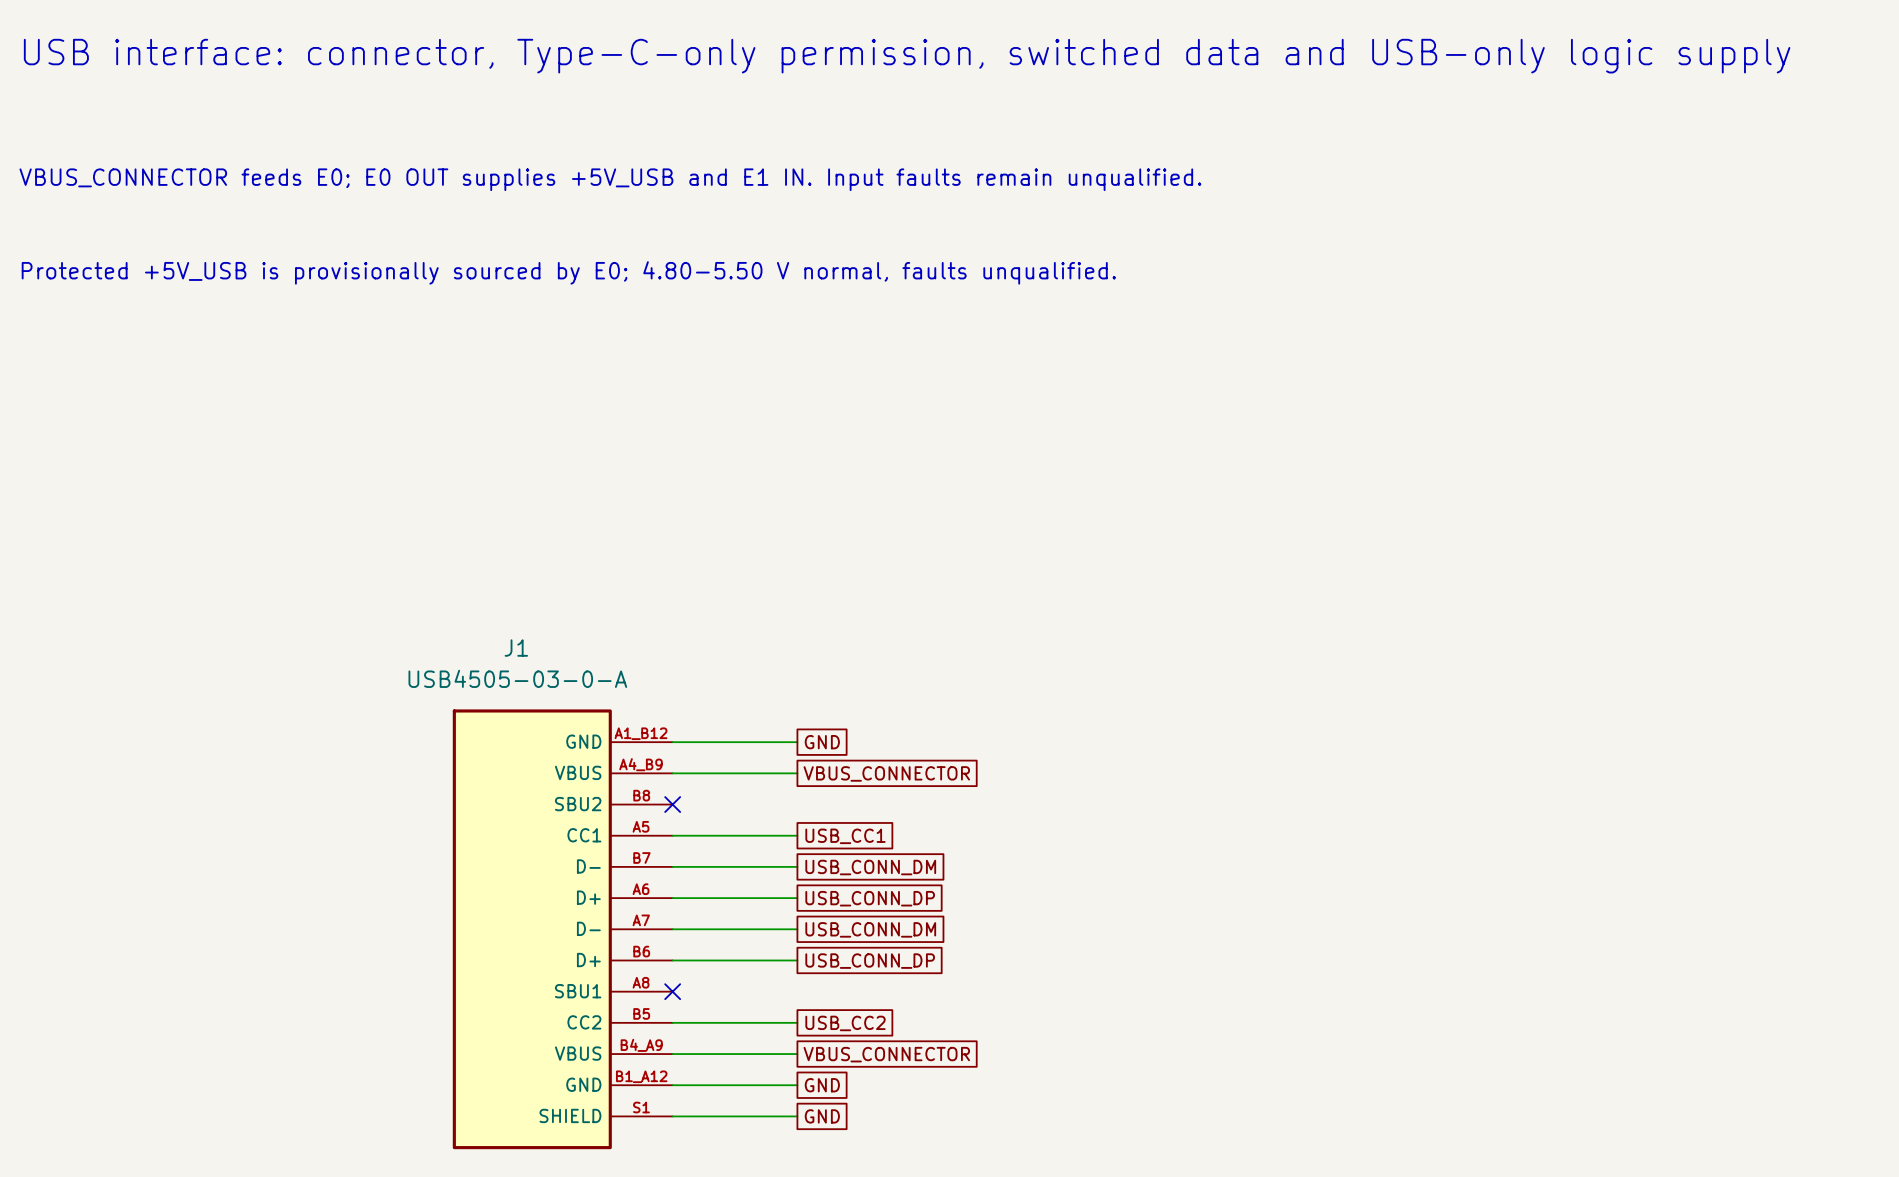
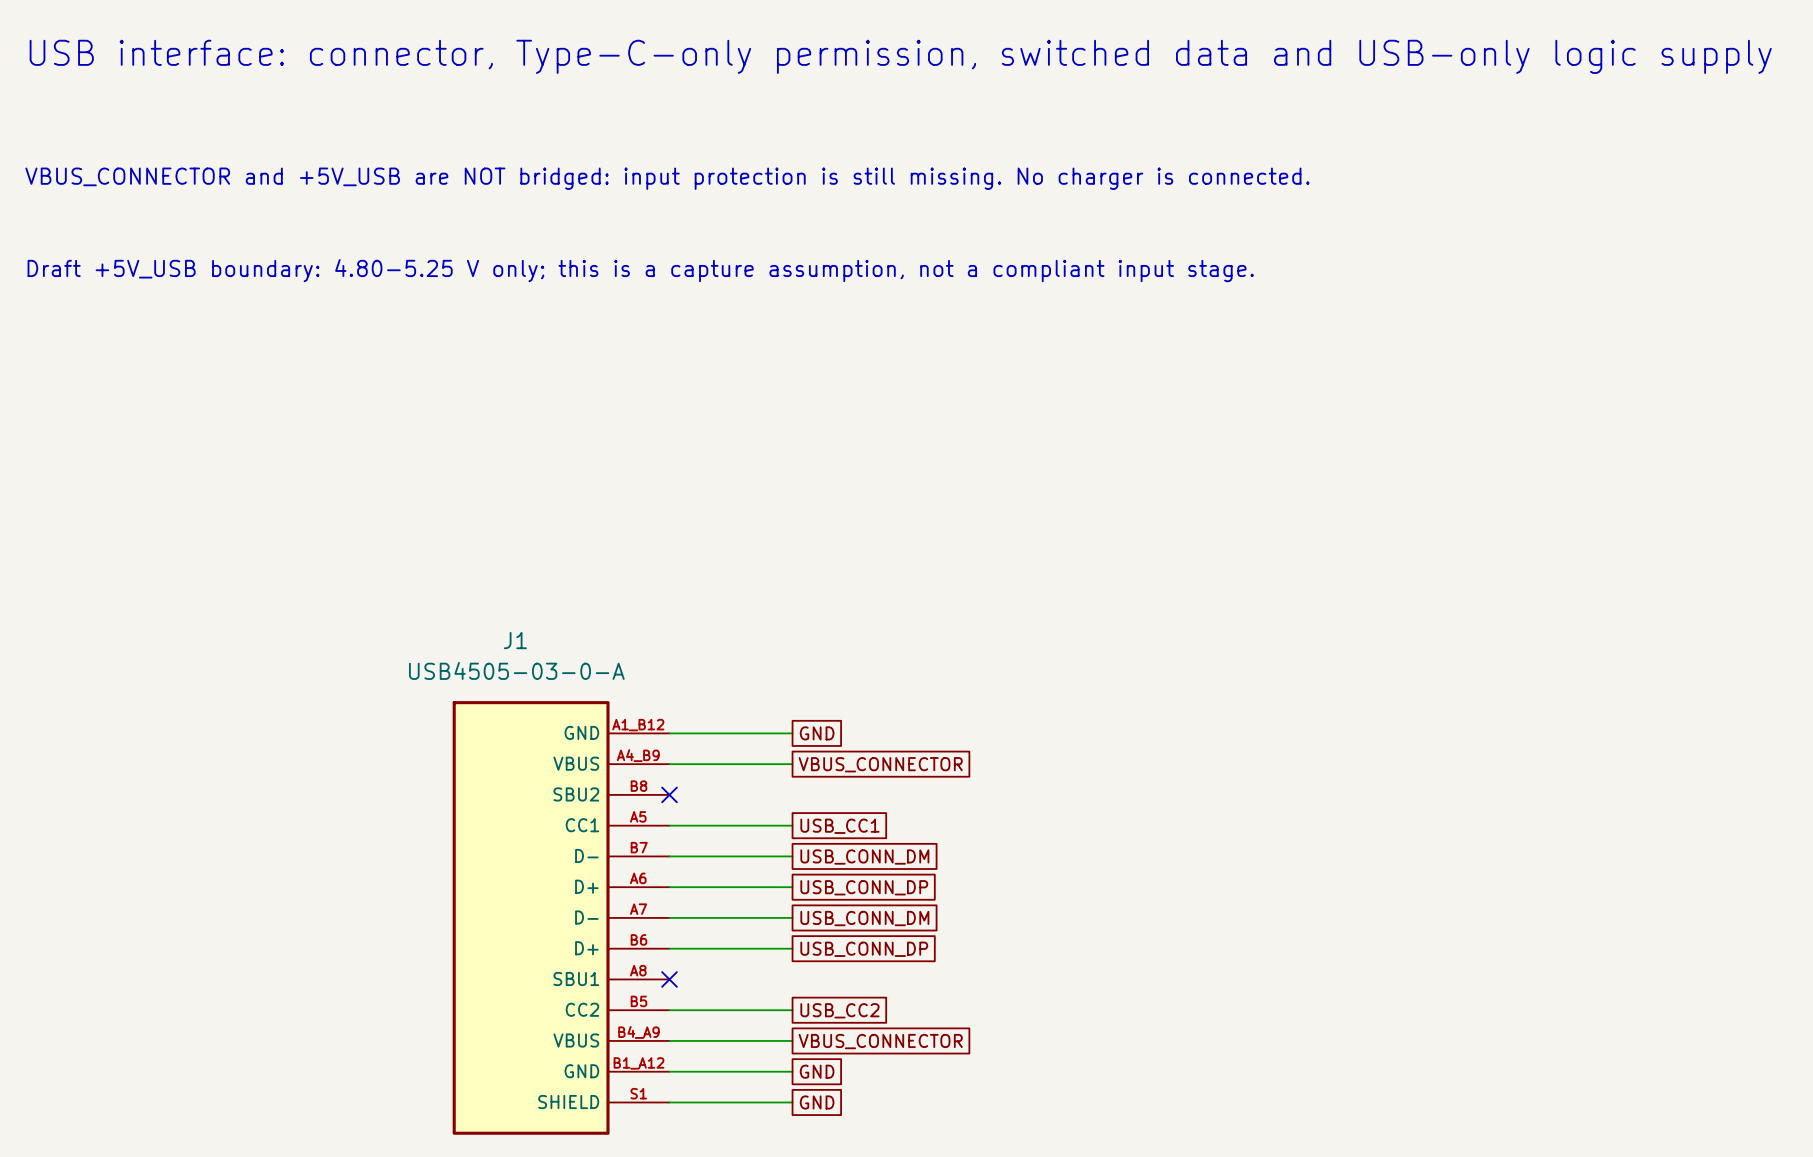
text: VBUS_CONNECTOR feeds E0; E0 OUT supplies +5V_USB and E1 IN. Input faults remain unqualified. (610, 179) -> VBUS_CONNECTOR and +5V_USB are NOT bridged: input protection is still missing. No charger is connected. (667, 178)
text: Protected +5V_USB is provisionally sourced by E0; 4.80-5.50 V normal, faults unqualified. (568, 272) -> Draft +5V_USB boundary: 4.80-5.25 V only; this is a capture assumption, not a compliant input stage. (640, 270)

